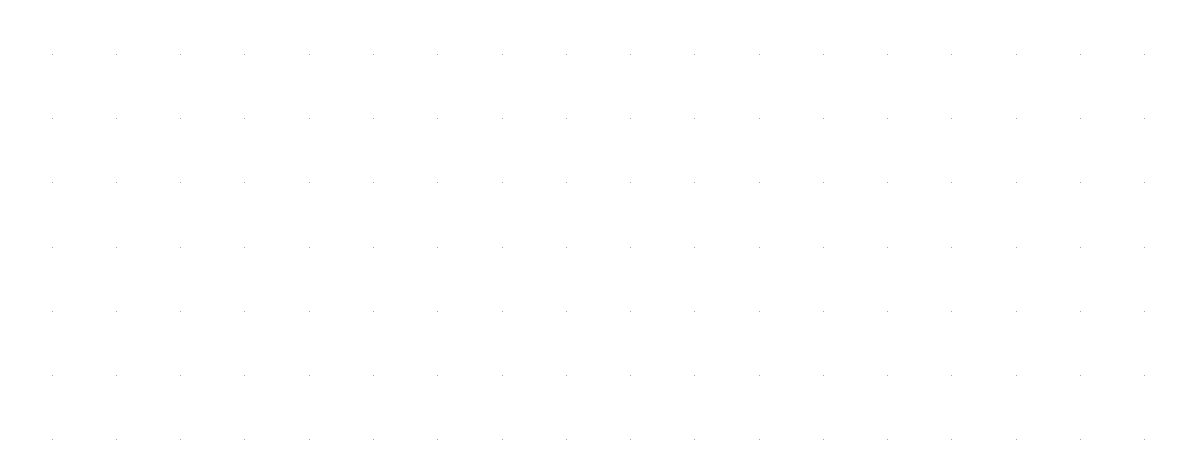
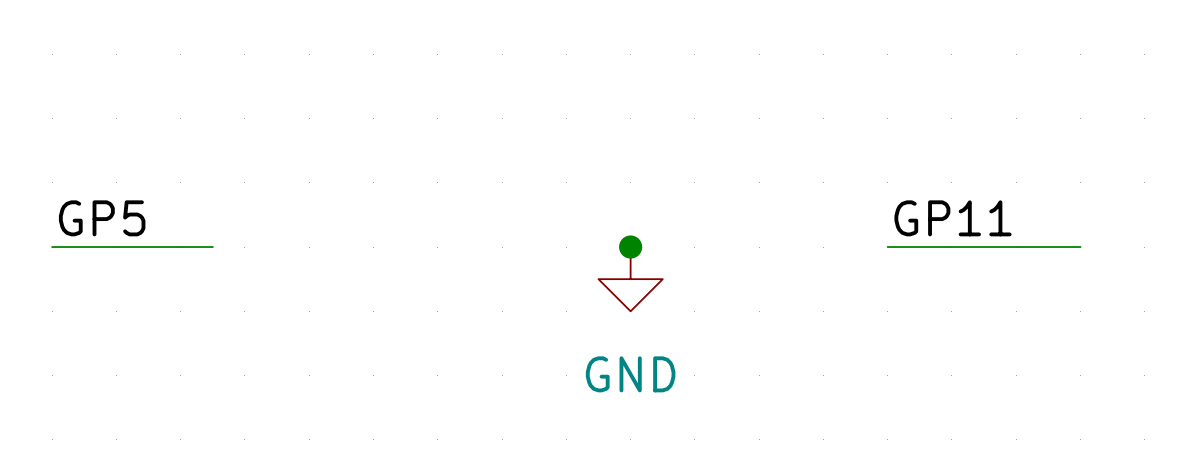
label: none -> GP5 (102, 218)
label: none -> GP11 (952, 218)
wire: none -> (52, 247) (212, 247)
junction: none -> (630, 247)
wire: none -> (887, 247) (1080, 247)
power symbol: none -> GND (630, 279)

